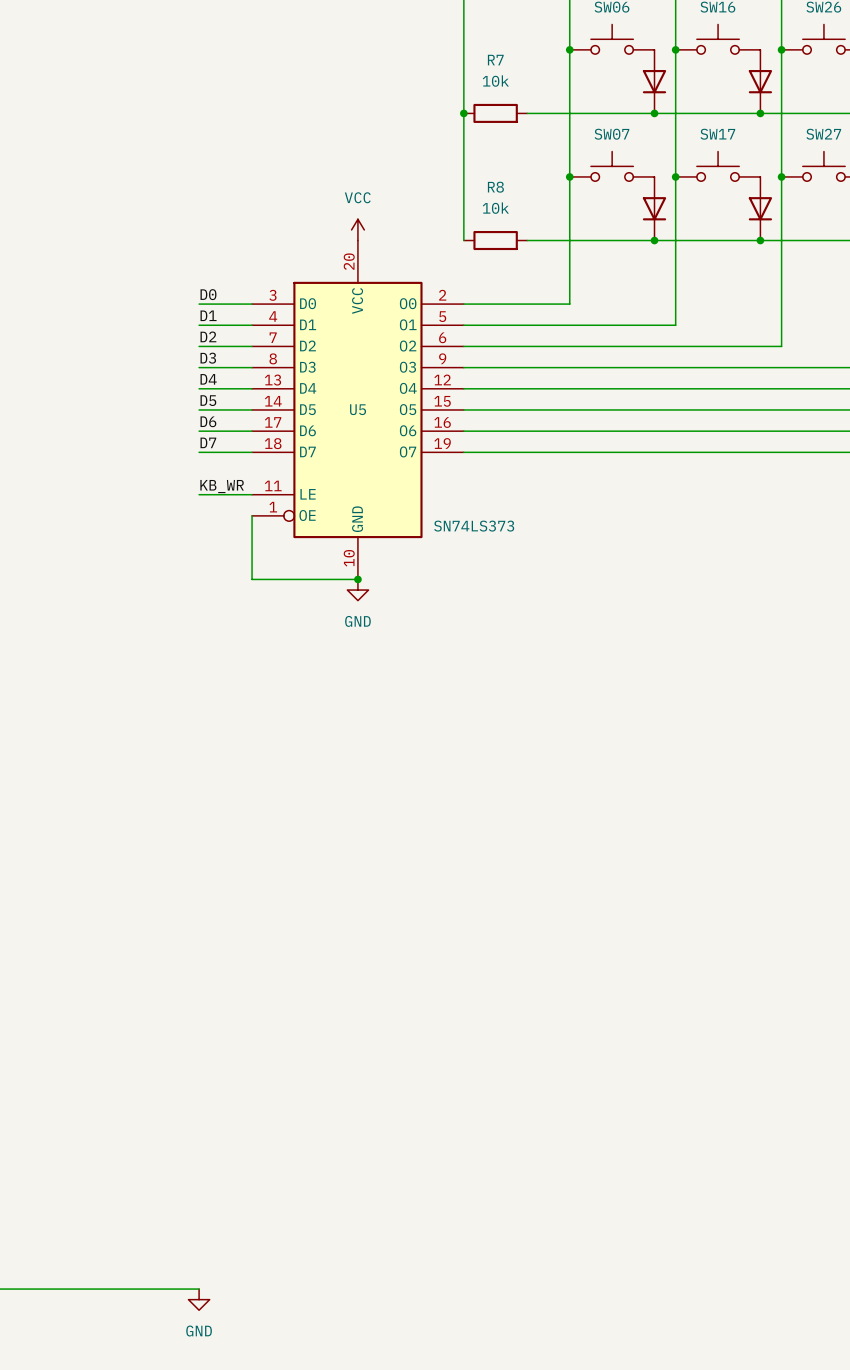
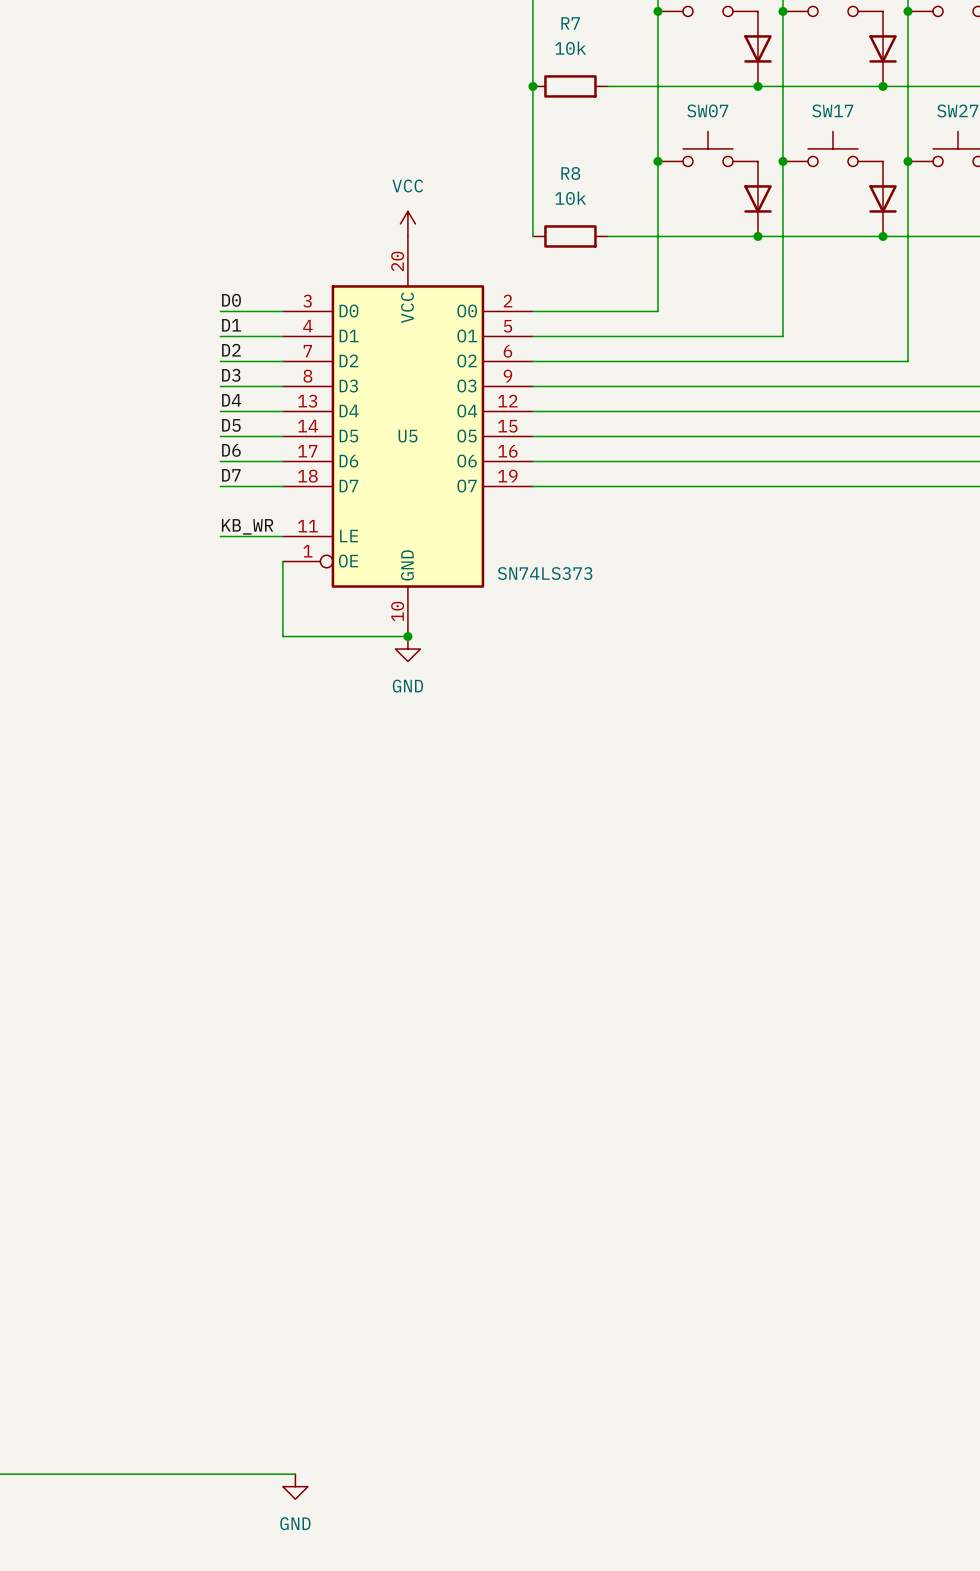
wire: none -> (220, 1474) (295, 1474)
power symbol position: GND (199, 1299) -> GND (295, 1486)

